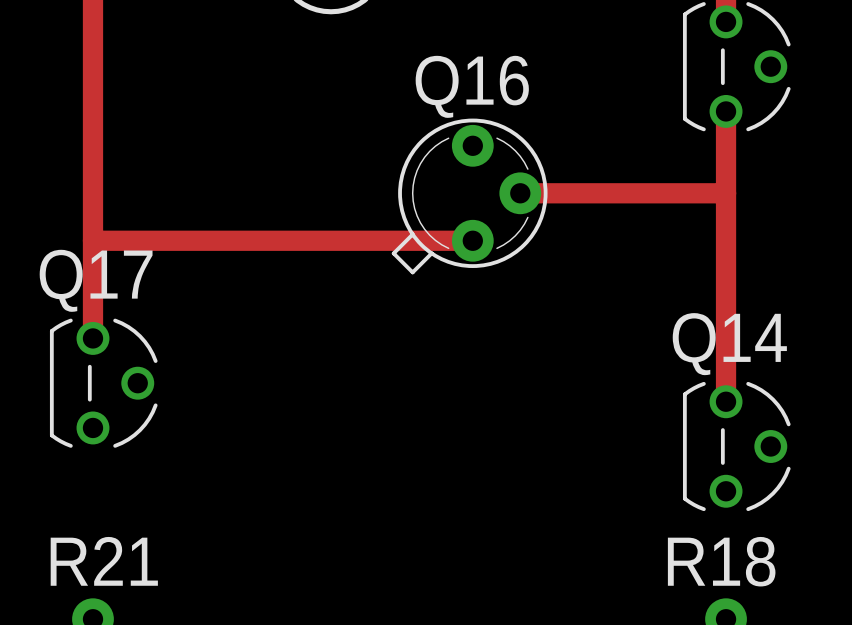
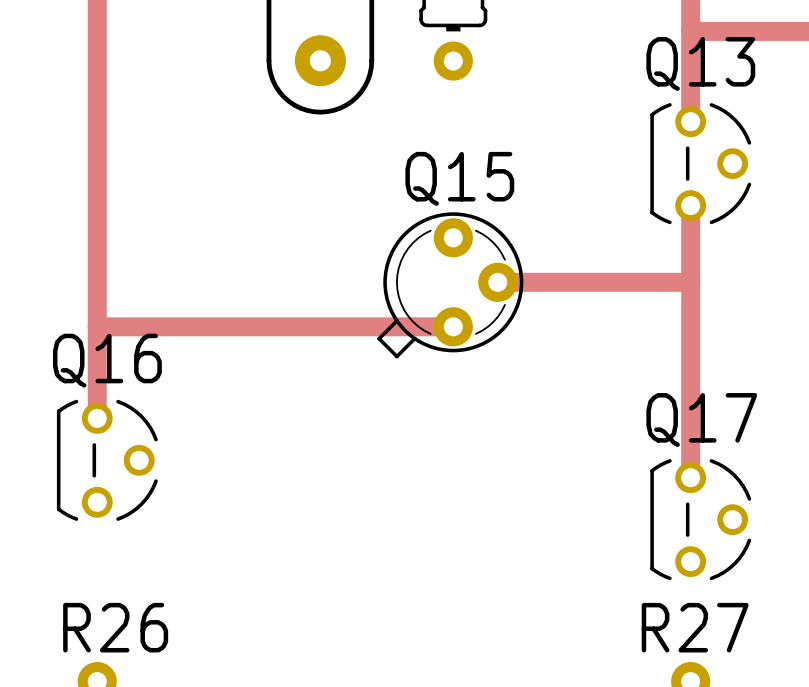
Q16 name: Q16 (472, 86) -> Q15 (459, 178)
Q17 name: Q17 (96, 280) -> Q16 (107, 360)
Q14 name: Q14 (729, 344) -> Q17 (701, 420)
R21 name: R21 (104, 561) -> R26 (115, 627)
R18 name: R18 (721, 561) -> R27 (695, 627)

